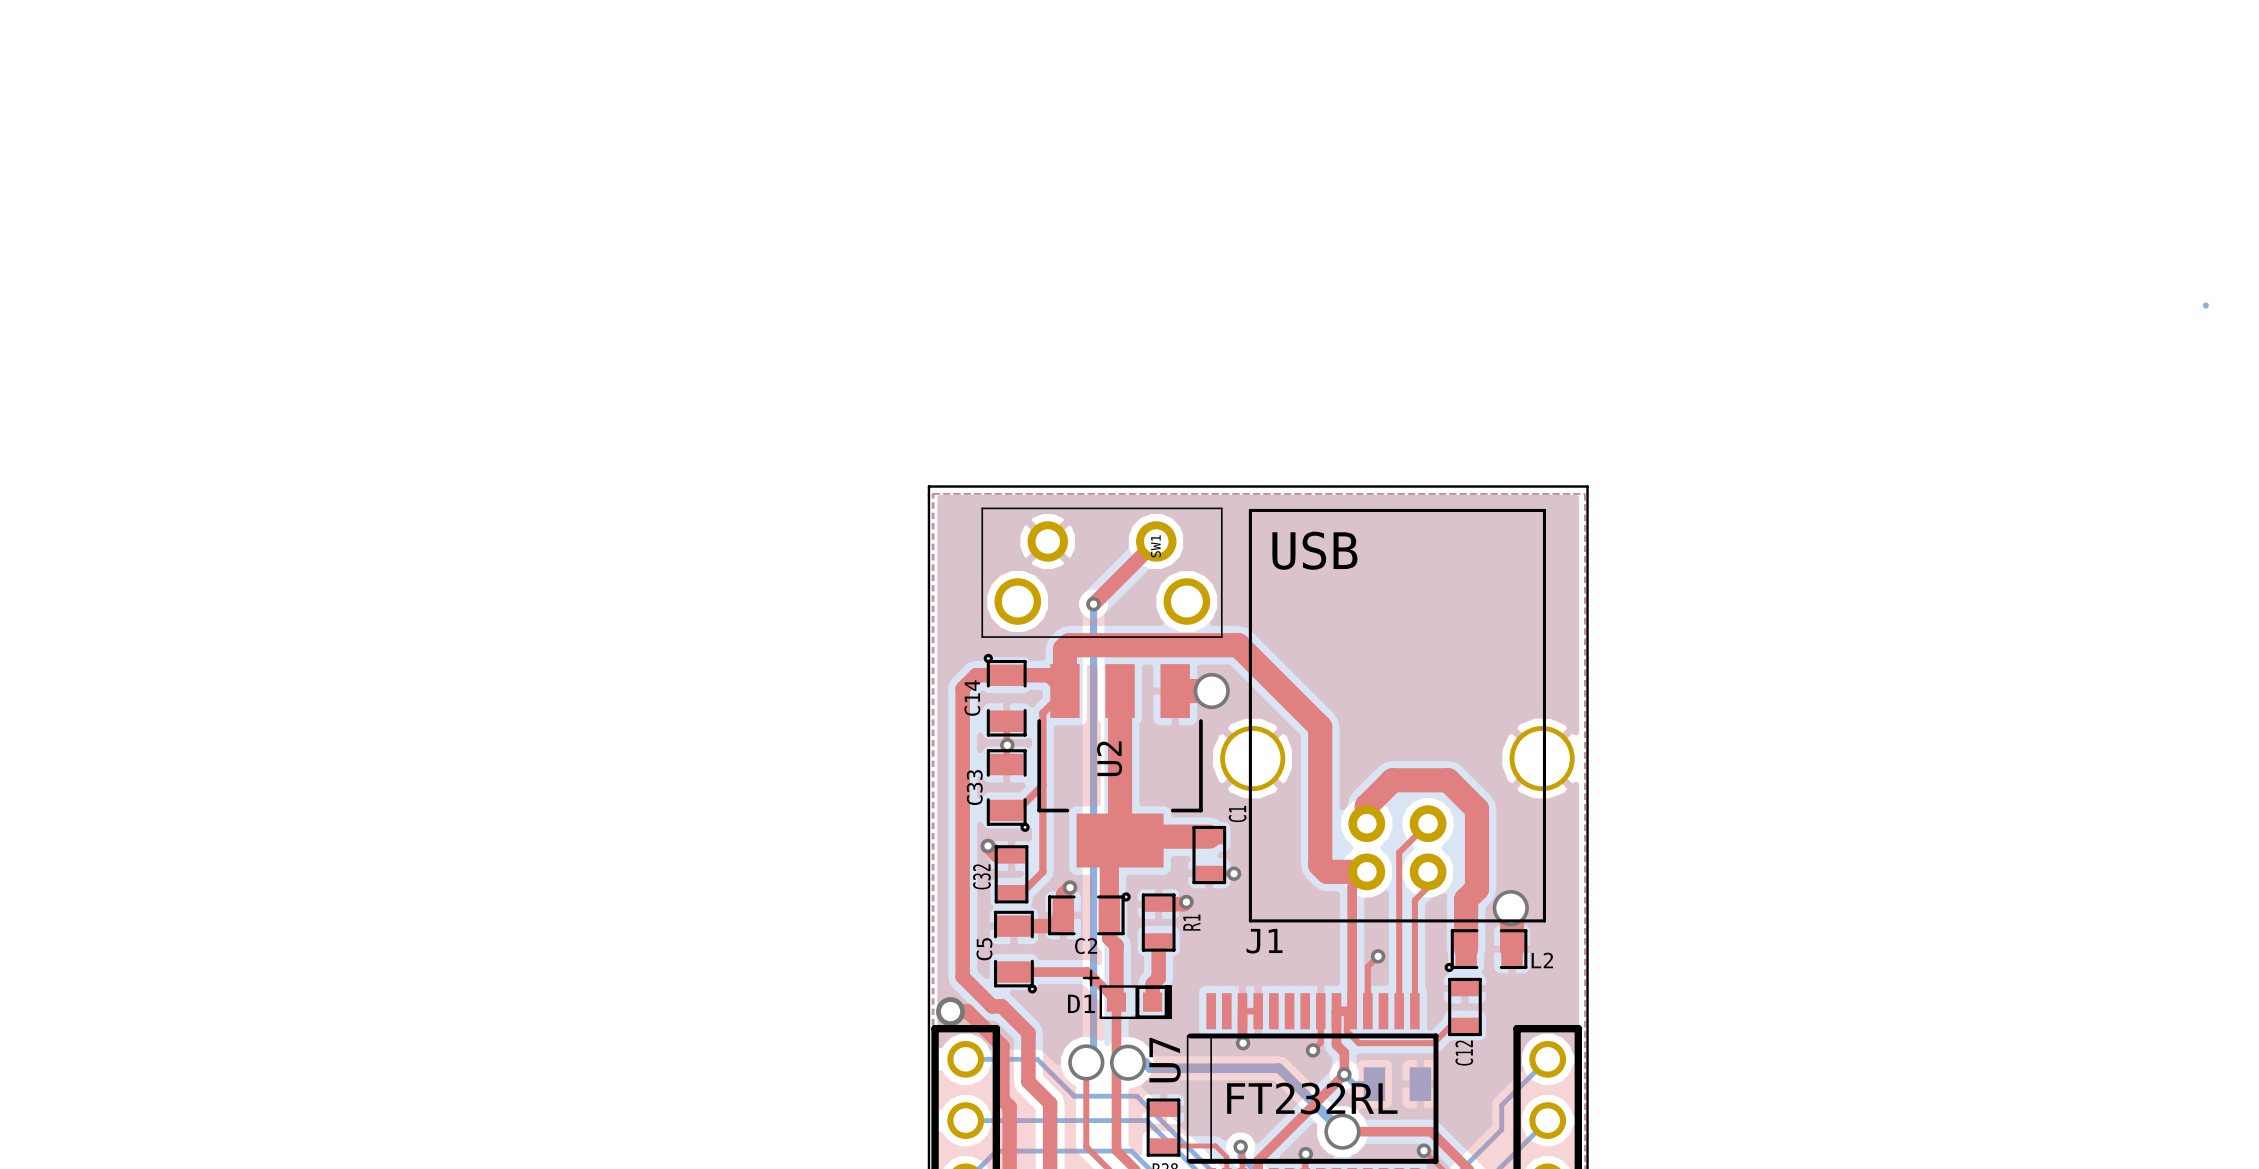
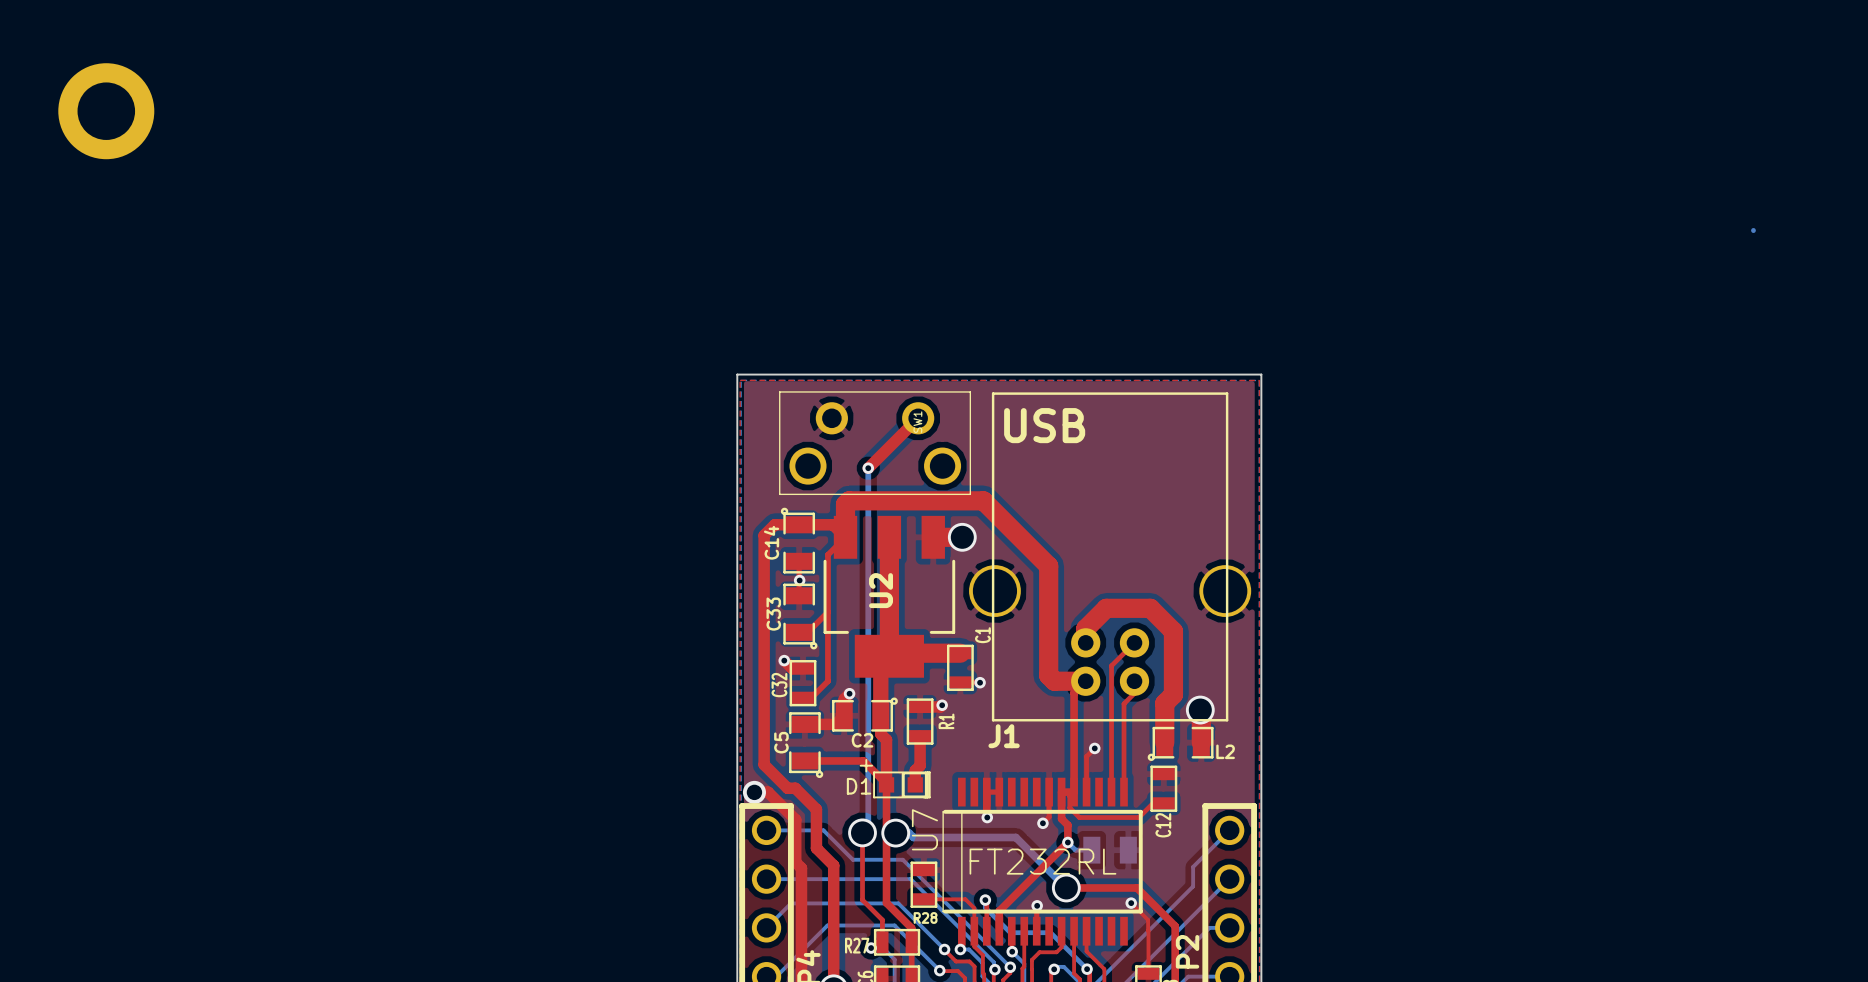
part: none -> (106, 111)

